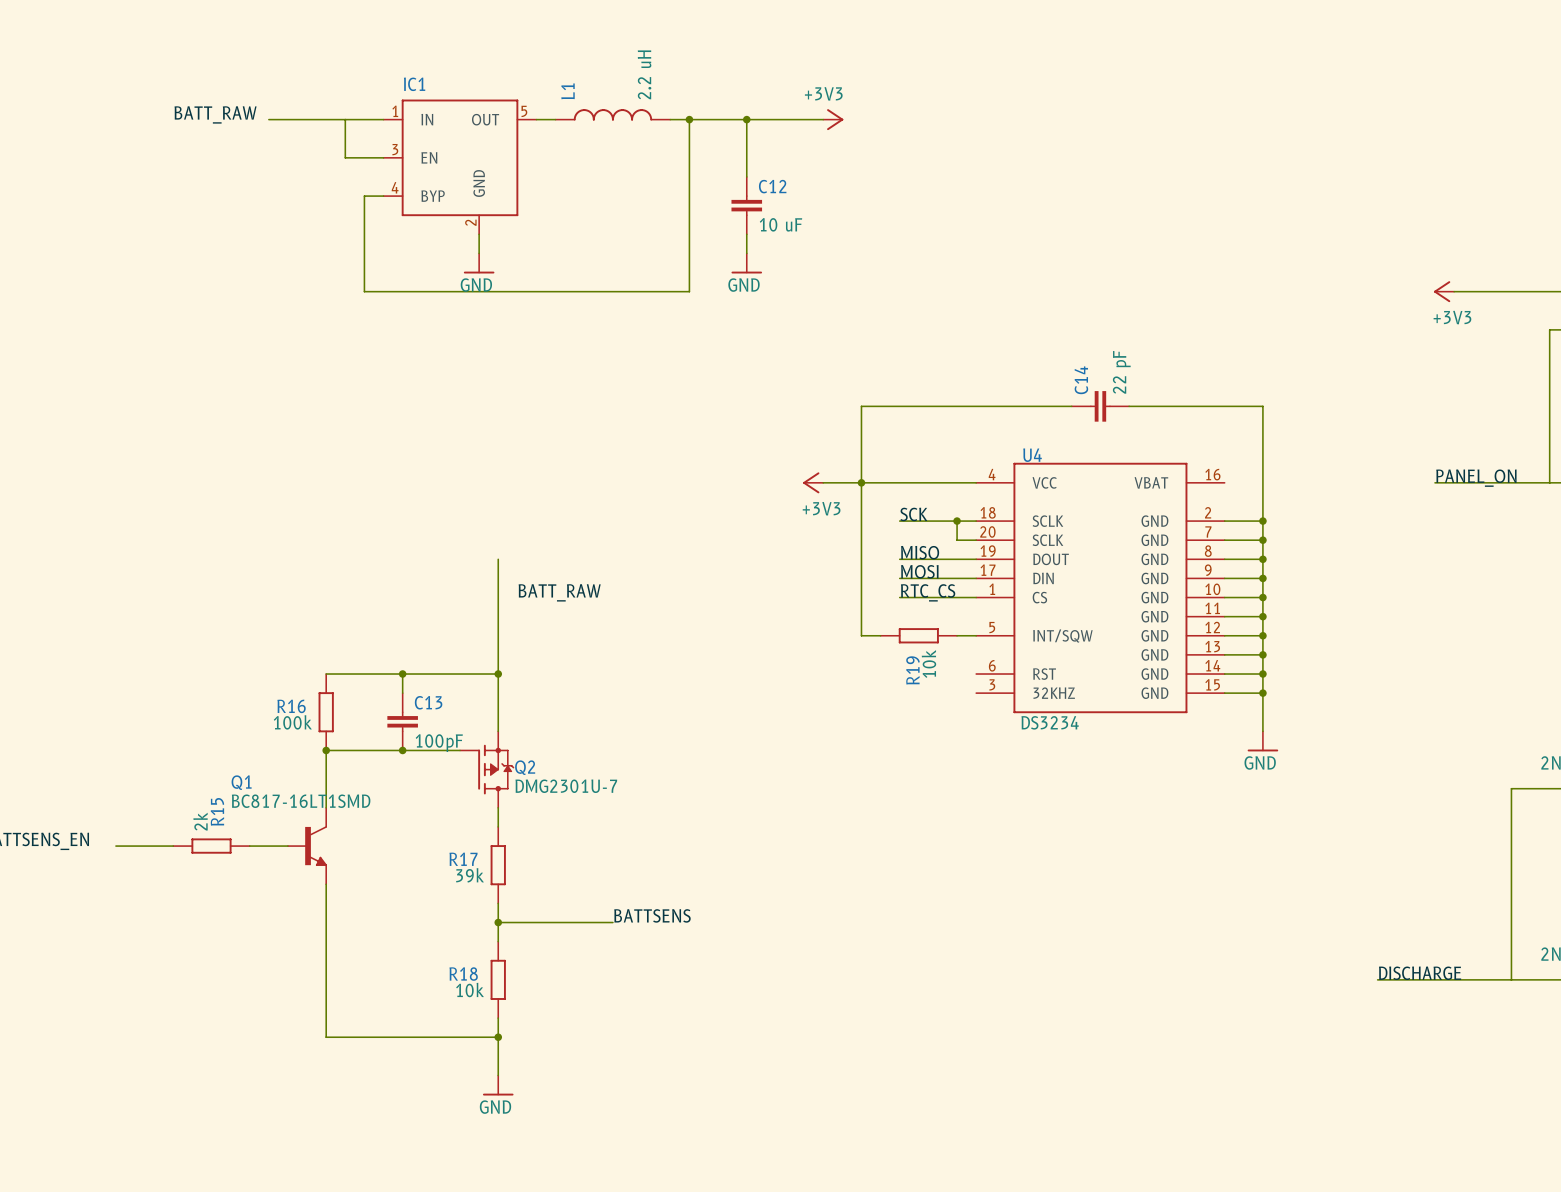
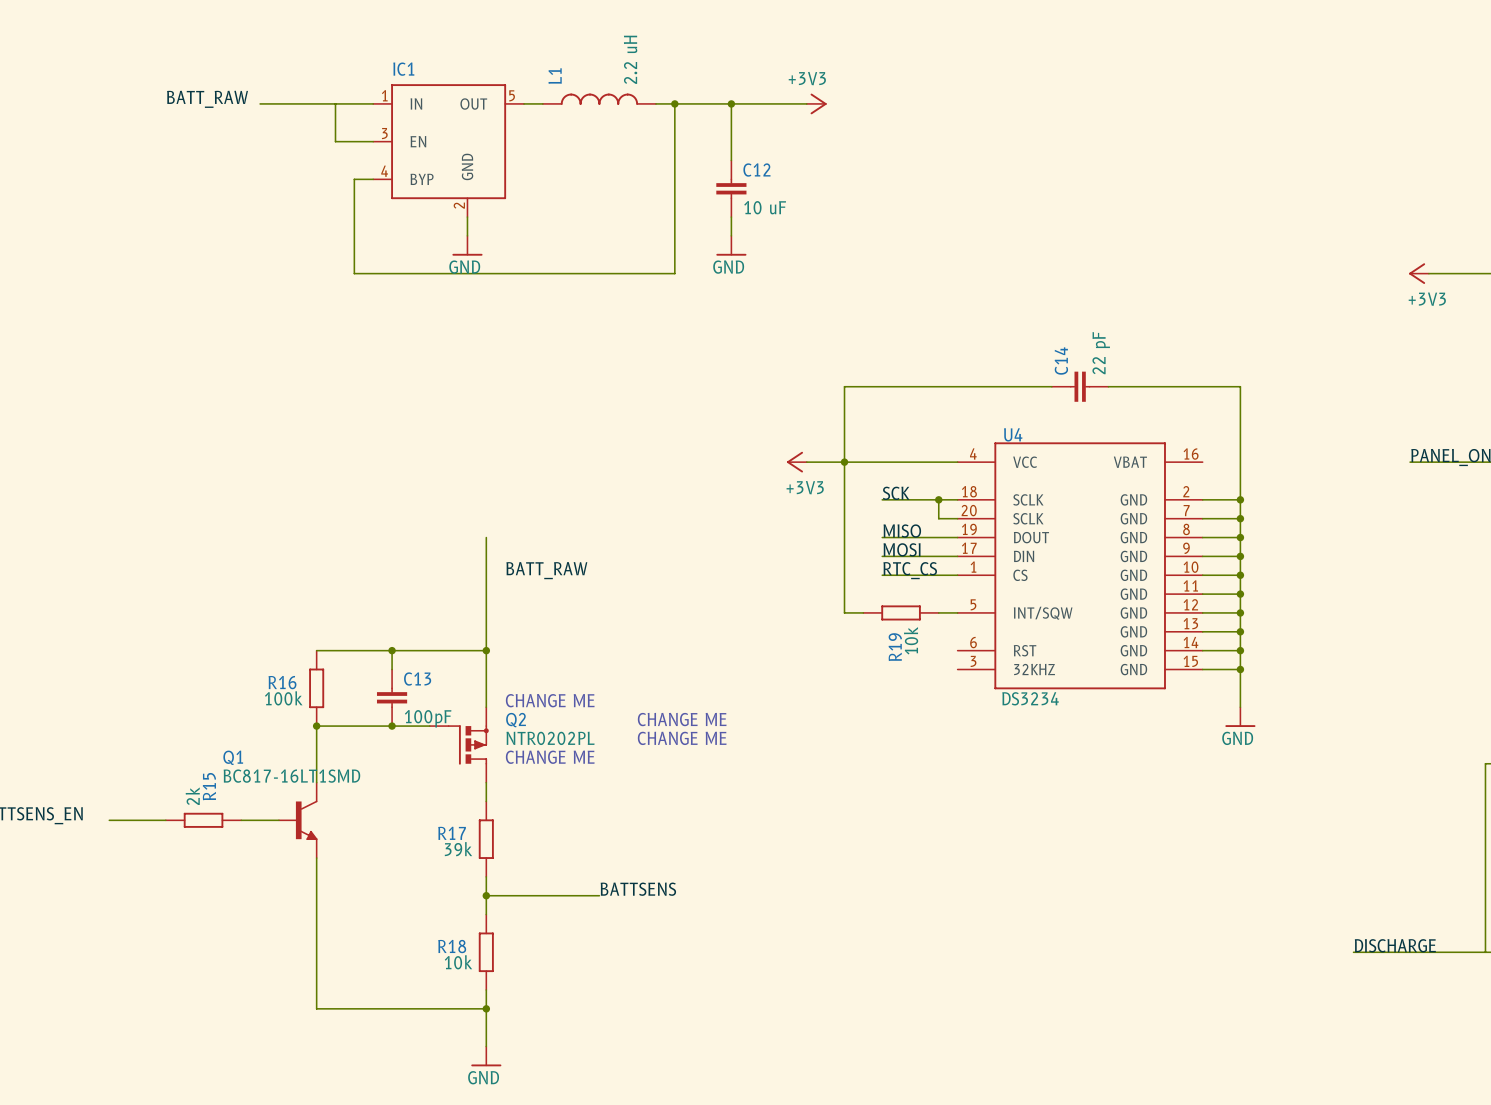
text: none -> CHANGE ME (550, 700)
Q2 symbol: [460, 731, 515, 808] -> [429, 707, 489, 783]
text: none -> CHANGE ME (682, 719)
text: none -> CHANGE ME (682, 738)
Q2 name position: Q2 (525, 767) -> Q2 (516, 720)
text: none -> CHANGE ME (550, 757)
Q2 value: DMG2301U-7 (566, 786) -> NTR0202PL (550, 738)

